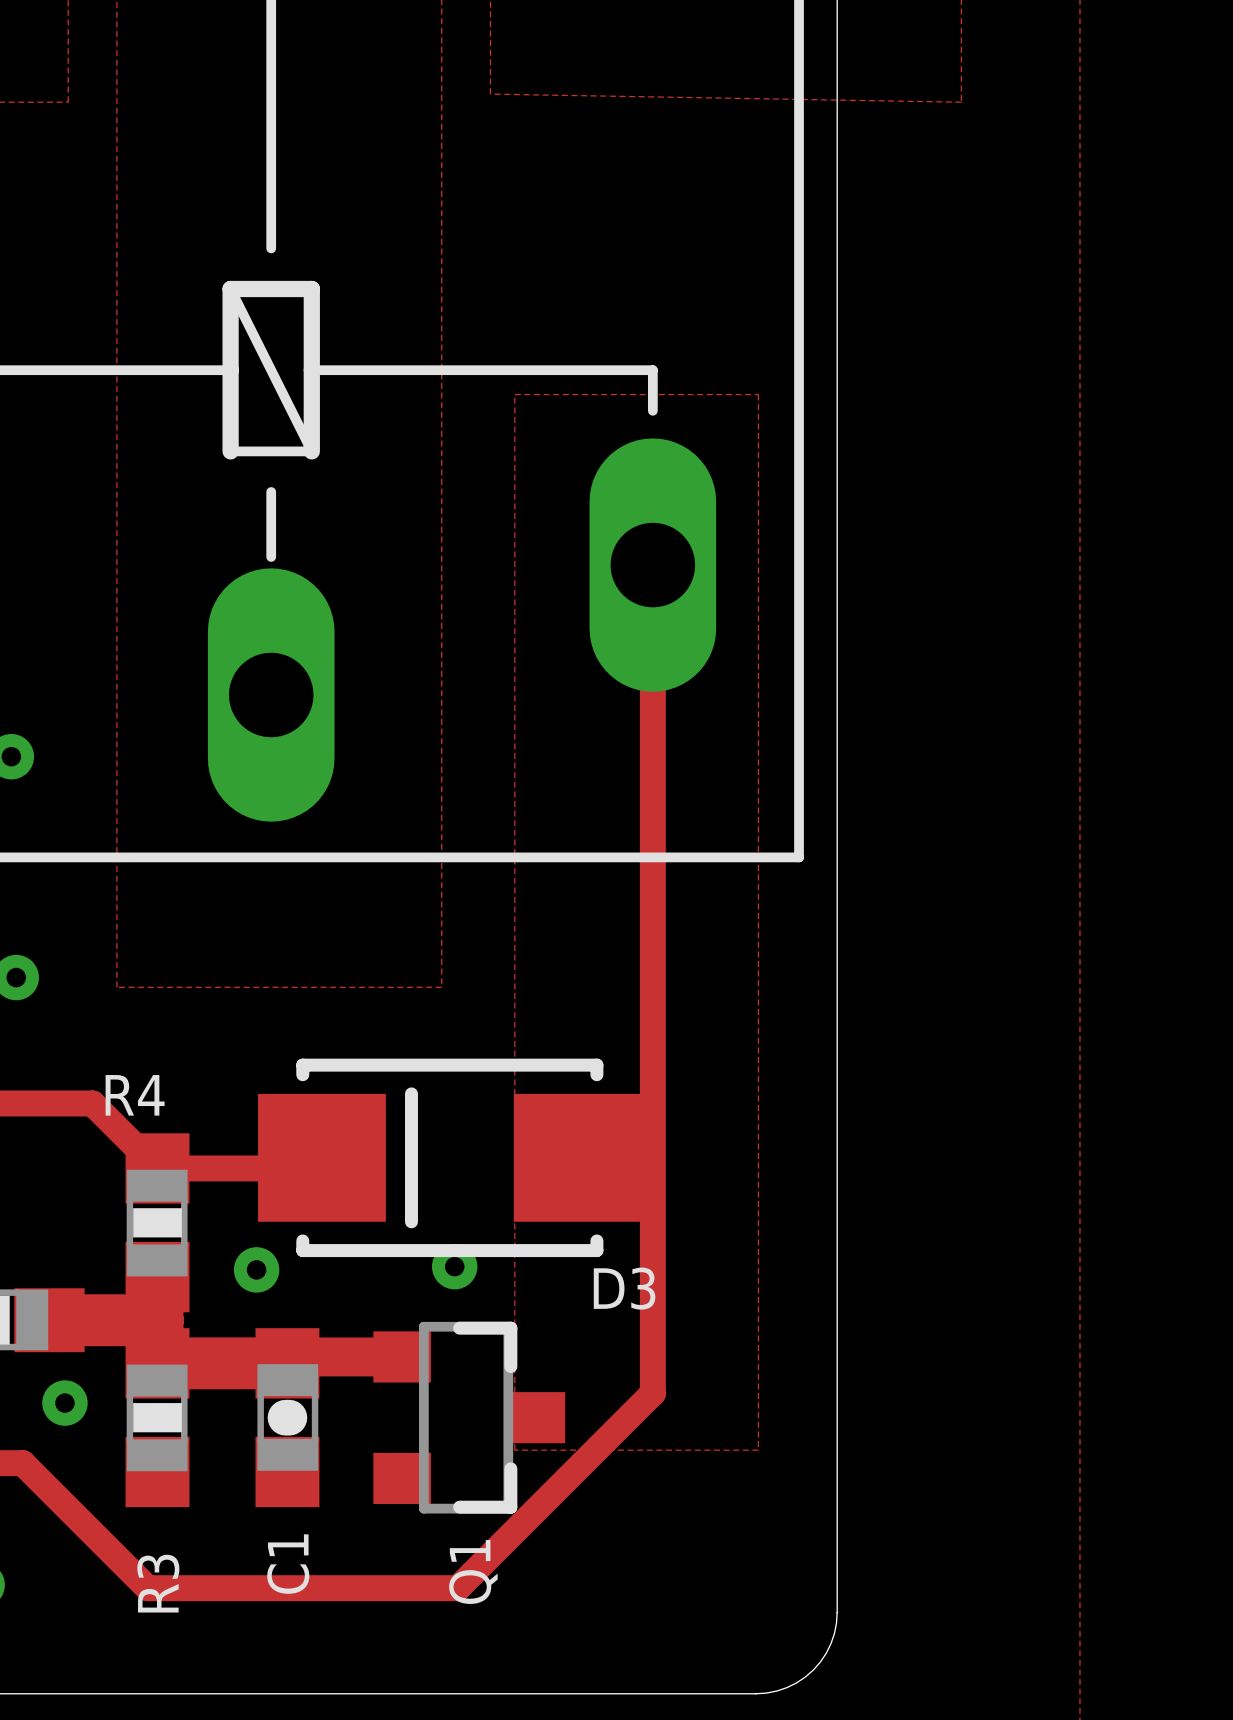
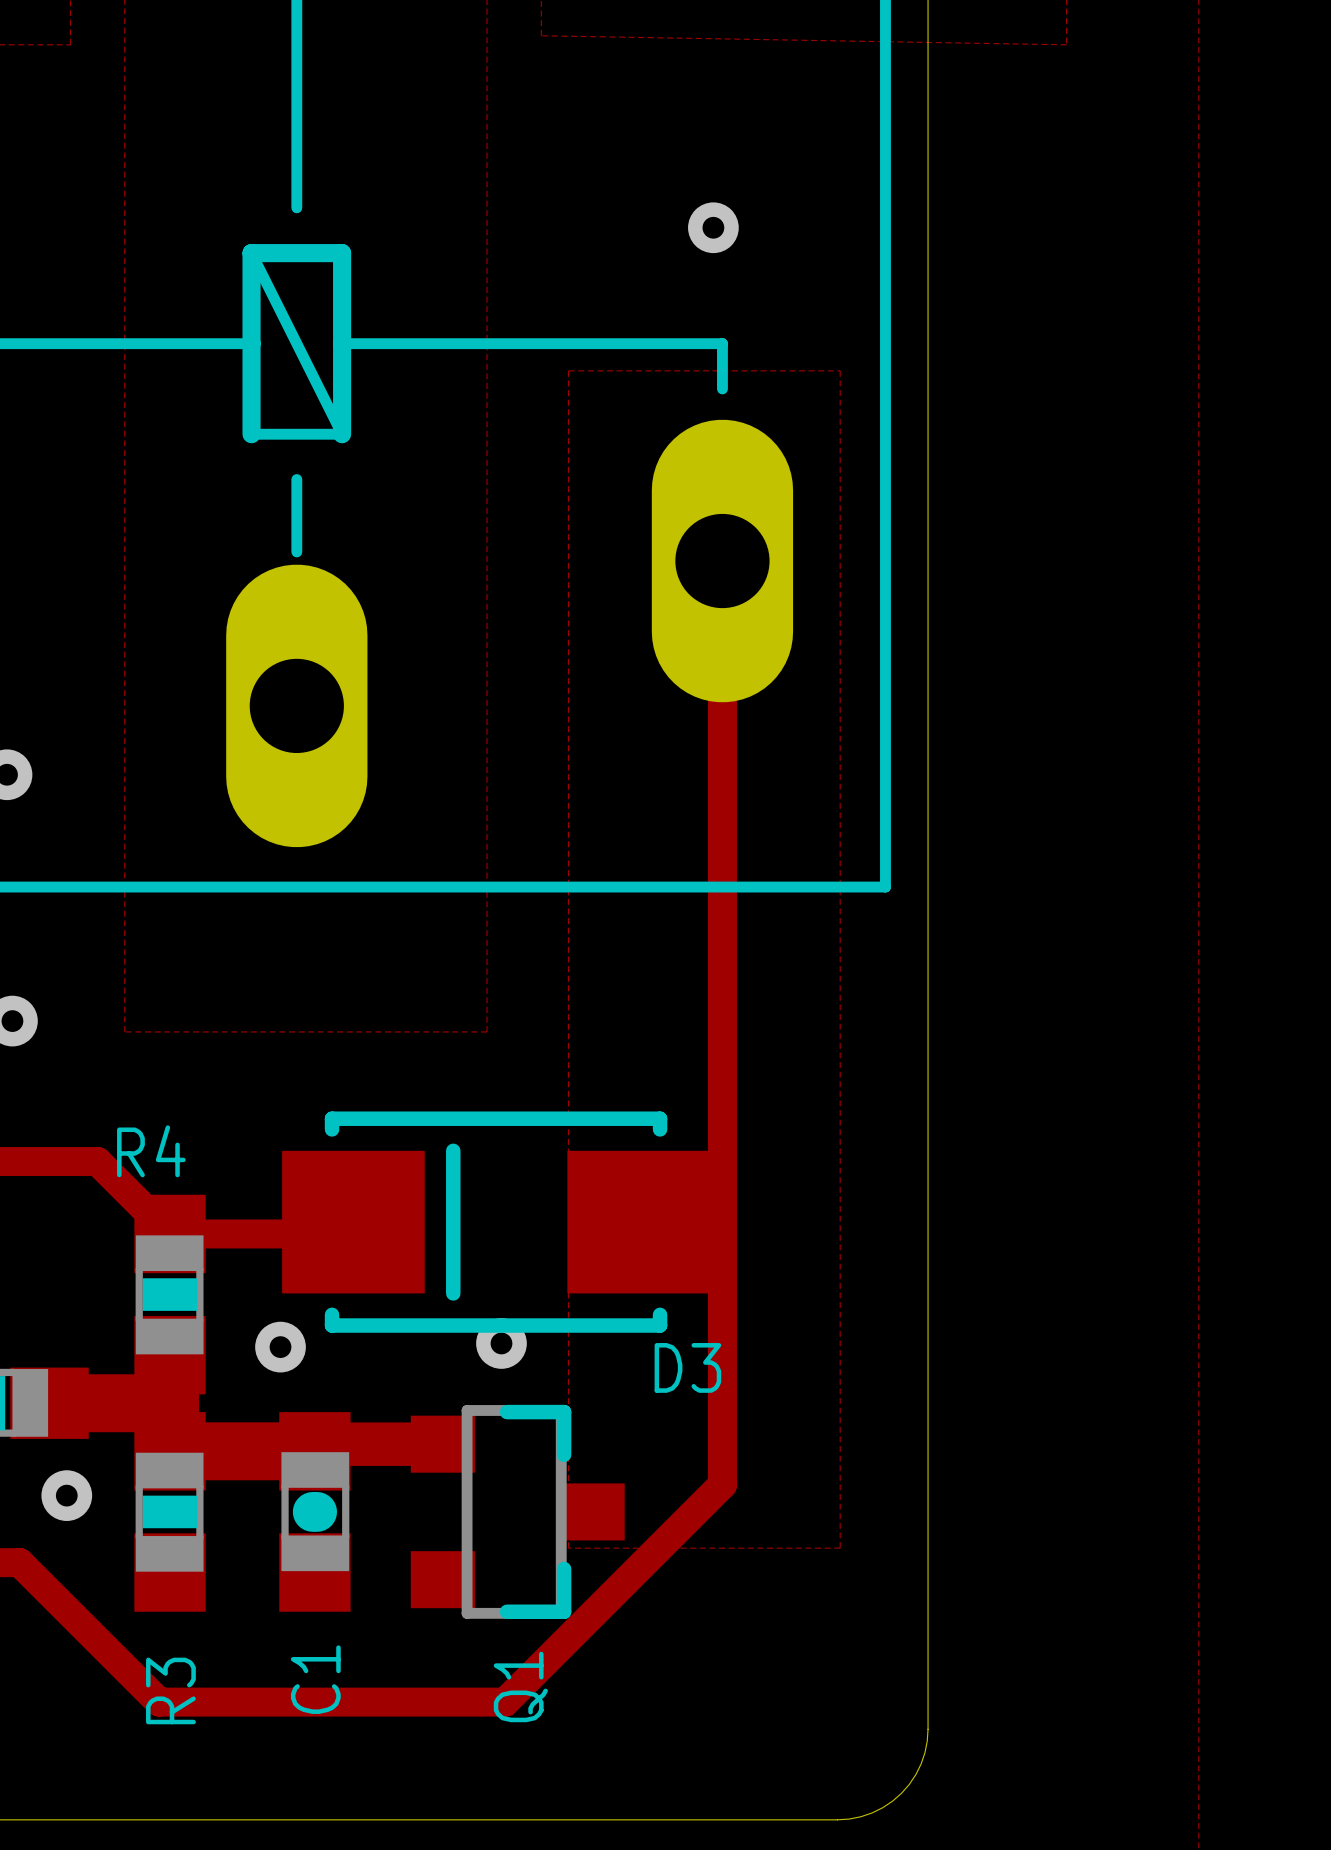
via: none -> (713, 227)

